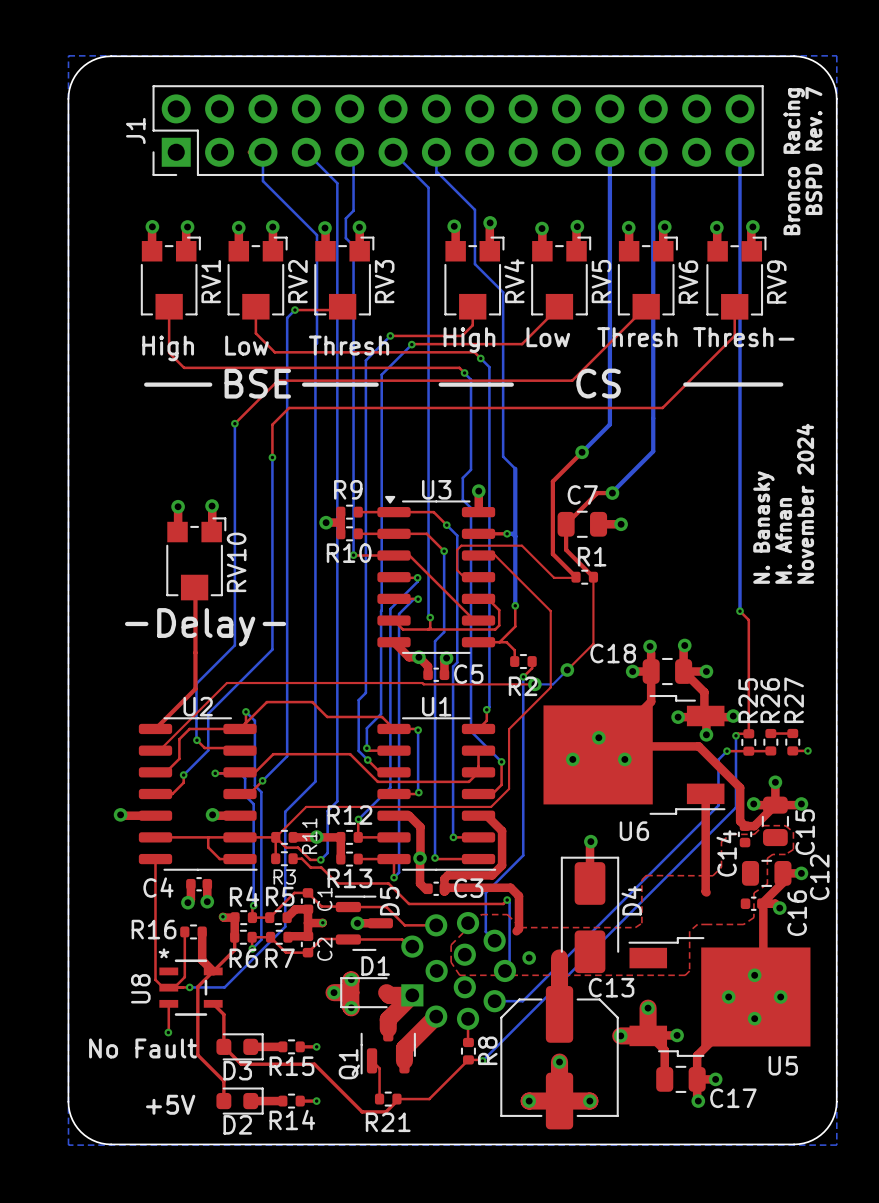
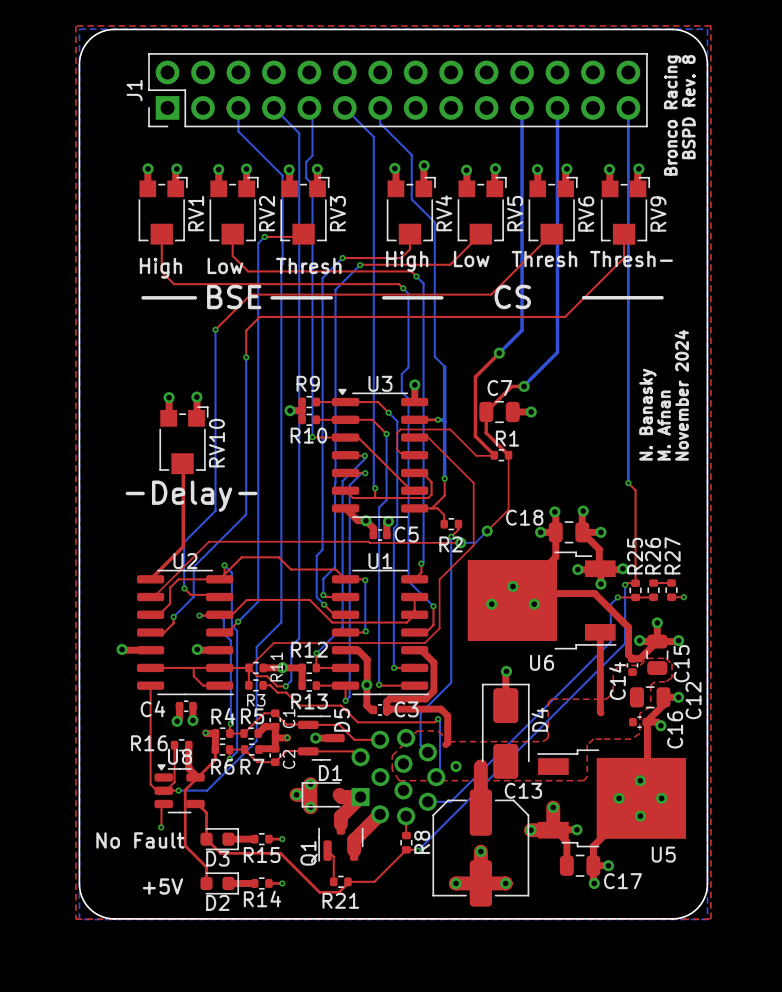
top zone outline: none -> (75, 25) (710, 25) (710, 919) (75, 919) (75, 25)
text: BSPD Rev. 7 (813, 150) -> BSPD Rev. 8 (688, 107)
U8 footprint: [159, 959, 223, 1016] -> [154, 764, 205, 814]
U8 name position: U8 (140, 988) -> U8 (179, 756)

